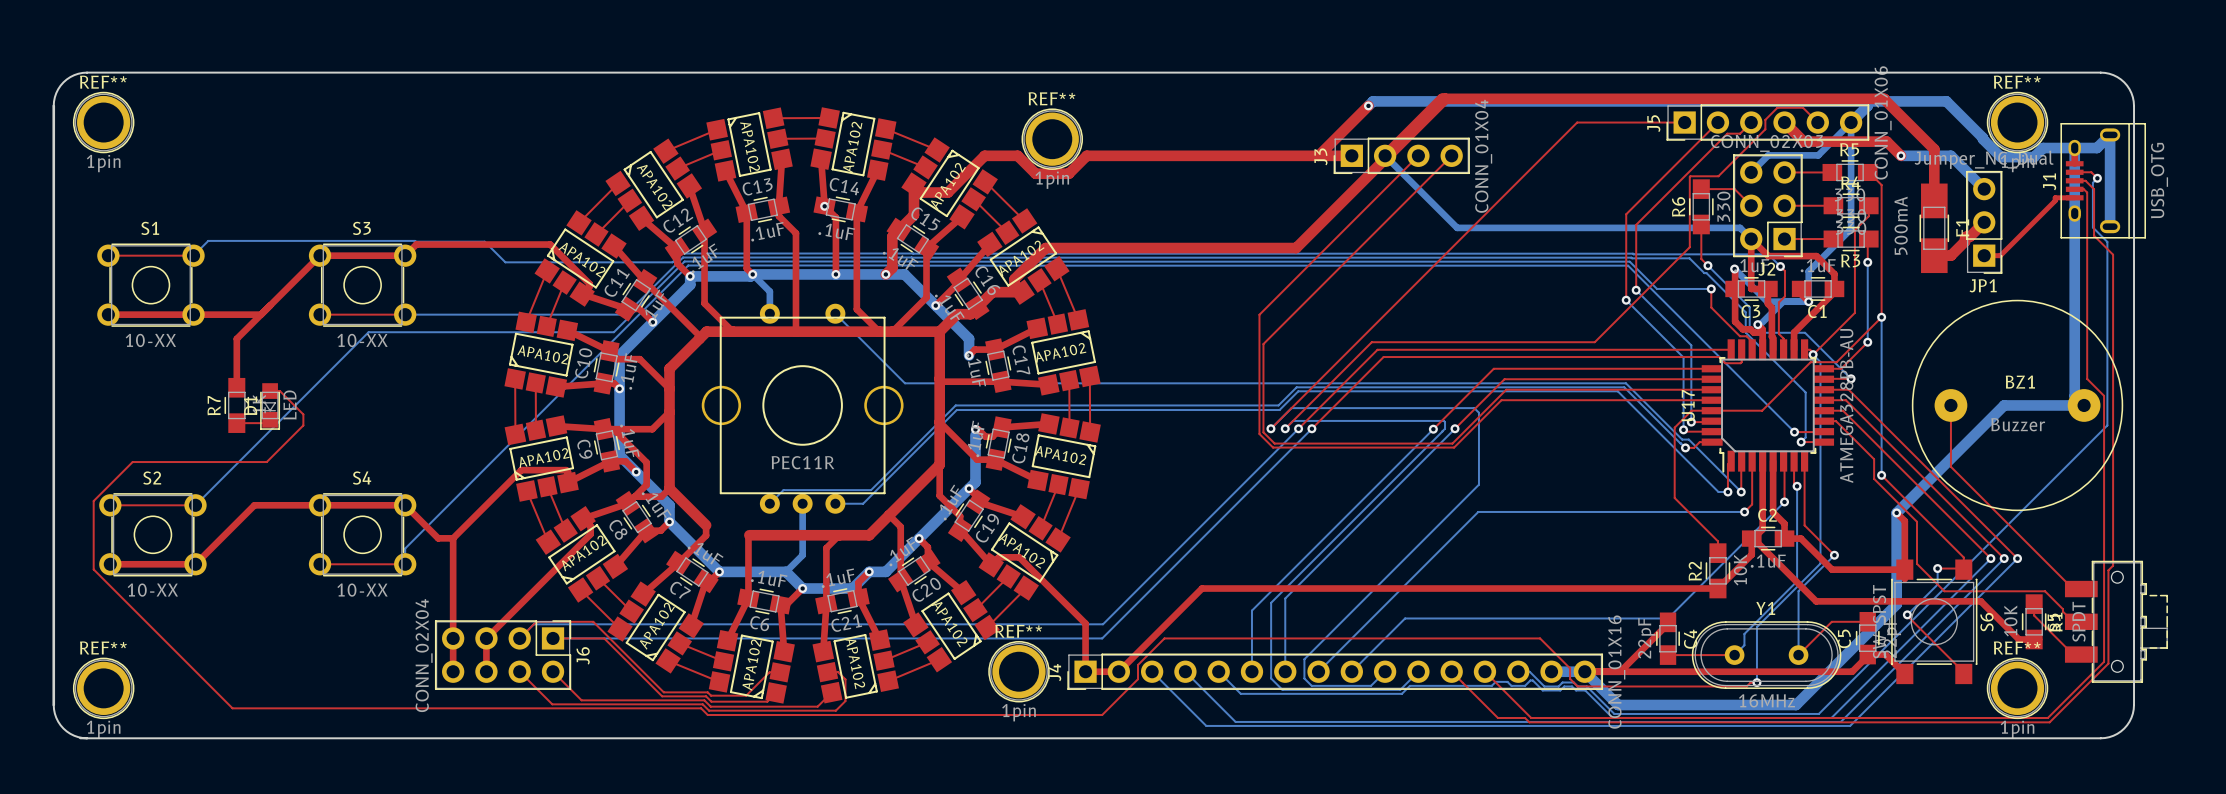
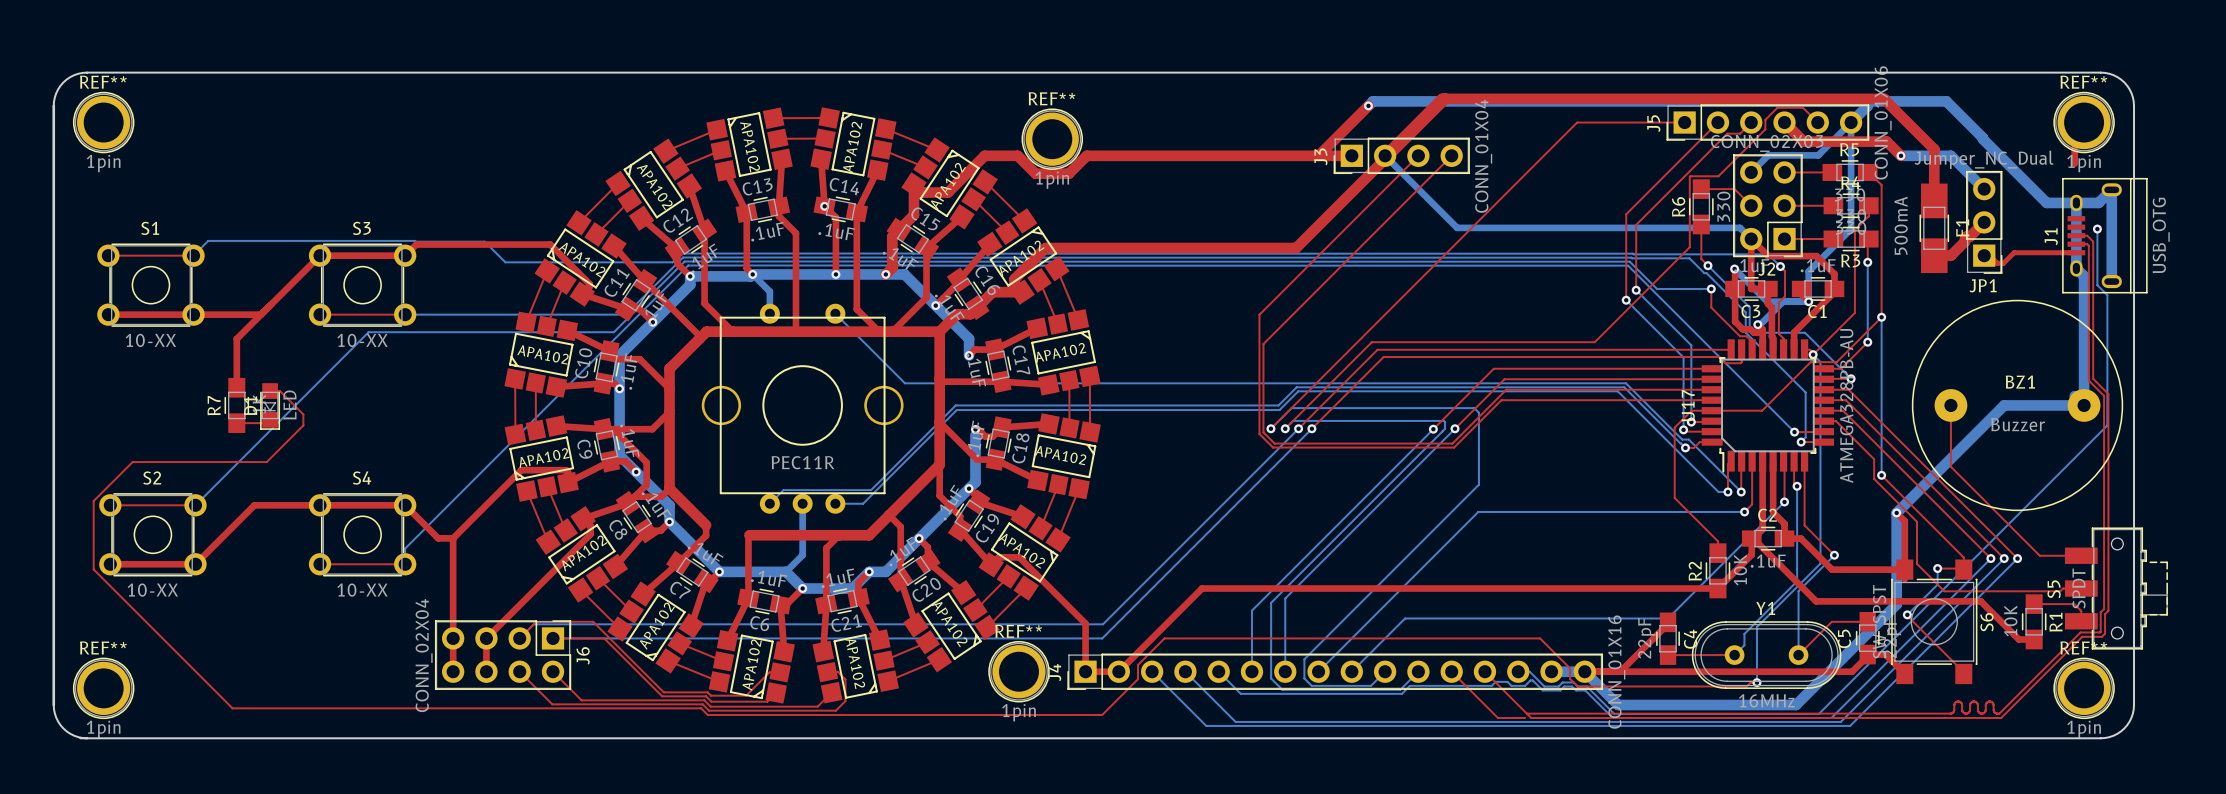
REF** position: (2017, 122) -> (2084, 122)
bottom track: (2074, 148) (2074, 396) -> none
bottom track: (2000, 157) (2034, 157) (2043, 148) (2096, 148) (2110, 134) (2110, 226) -> (2000, 157) (2046, 202) (2098, 202) (2111, 189) (2111, 281)
top track: (2074, 172) (2091, 172) (2097, 178) -> none
bottom track: (2097, 178) (2092, 182) (2092, 227) (2107, 241) (2107, 295) -> (2097, 229) (2097, 285) (2107, 295)
via position: (2097, 178) -> (2097, 229)
top track: (2074, 180) (2085, 180) (2094, 189) (2094, 235) (2113, 254) (2113, 565) (2108, 570) -> (2076, 235) (2087, 235) (2093, 241) (2093, 378) (2108, 394) (2108, 570)
J1 position: (2103, 180) -> (2104, 235)
top track: (2074, 189) (2083, 189) (2087, 192) (2087, 378) (2088, 380) -> (2076, 244) (2088, 245) (2088, 380)
top track: (2074, 197) (2055, 197) (2055, 200) (2000, 255) (1989, 255) -> none
bottom track: none -> (2076, 202) (2076, 268) (2084, 276) (2084, 405)
top track: none -> (2076, 252) (2014, 252) (2003, 263) (1997, 263) (1992, 258) (1992, 255)
top track: (2039, 555) (2073, 589) -> (2039, 555) (2081, 555)
top track: (2045, 591) (2073, 621) -> (2045, 591) (2081, 588)
top track: (2034, 604) (2034, 615) (2073, 654) (2081, 654) -> (2034, 604) (2074, 604) (2081, 611) (2081, 621)
top track: (2104, 608) (2104, 661) (2047, 717) (2001, 717) -> (2108, 610) (2105, 614) (2105, 633) (2101, 636) (2082, 636) (2001, 717)
top track: none -> (2104, 608) (2100, 612) (2100, 631) (2080, 632) (1999, 713) (1994, 712) (1993, 703) (1989, 701) (1986, 702) (1985, 711) (1981, 713) (1978, 712) (1977, 703) (1973, 701) (1970, 702) (1969, 711) (1966, 713) (1963, 712) (1961, 703) (1958, 701) (1955, 702) (1953, 711) (1950, 713) (1526, 713)
top track: (2108, 610) (2108, 663) (2049, 722) (1529, 722) (1525, 717) -> none
S5 position: (2116, 621) -> (2116, 588)
REF** position: (2017, 688) -> (2084, 688)

